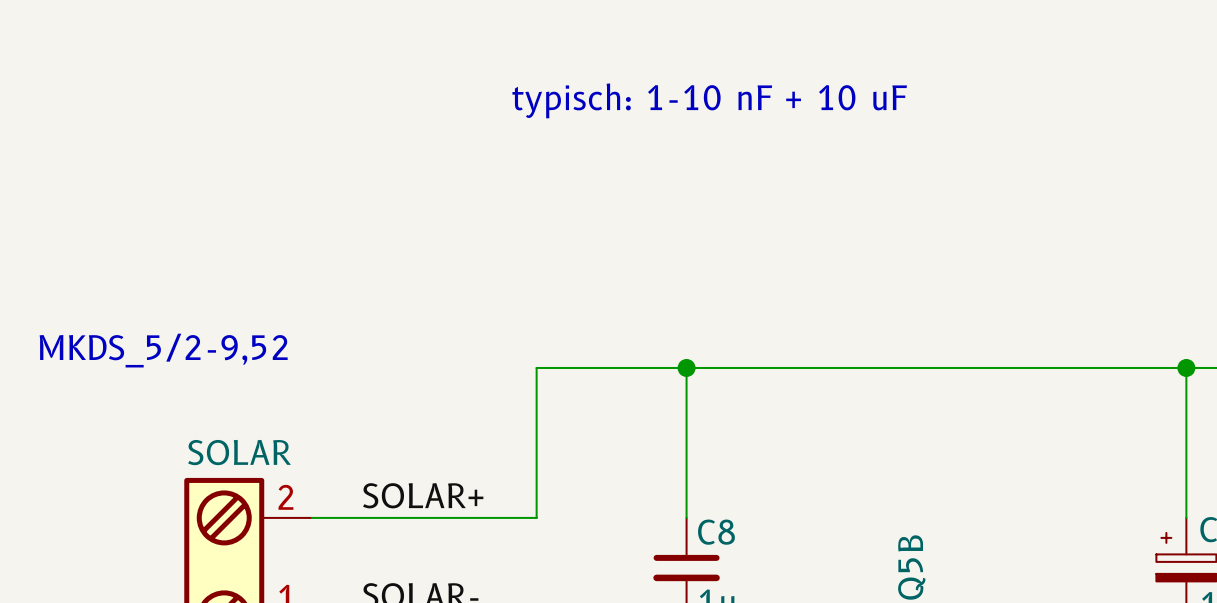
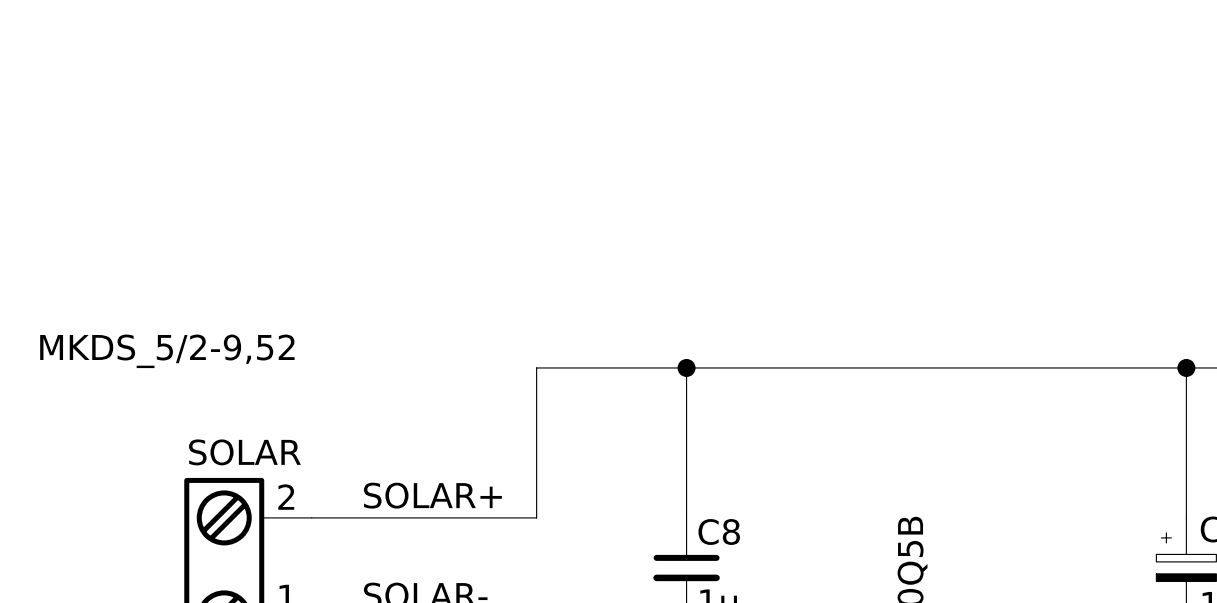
text: typisch: 1-10 nF + 10 uF (709, 100) -> none

